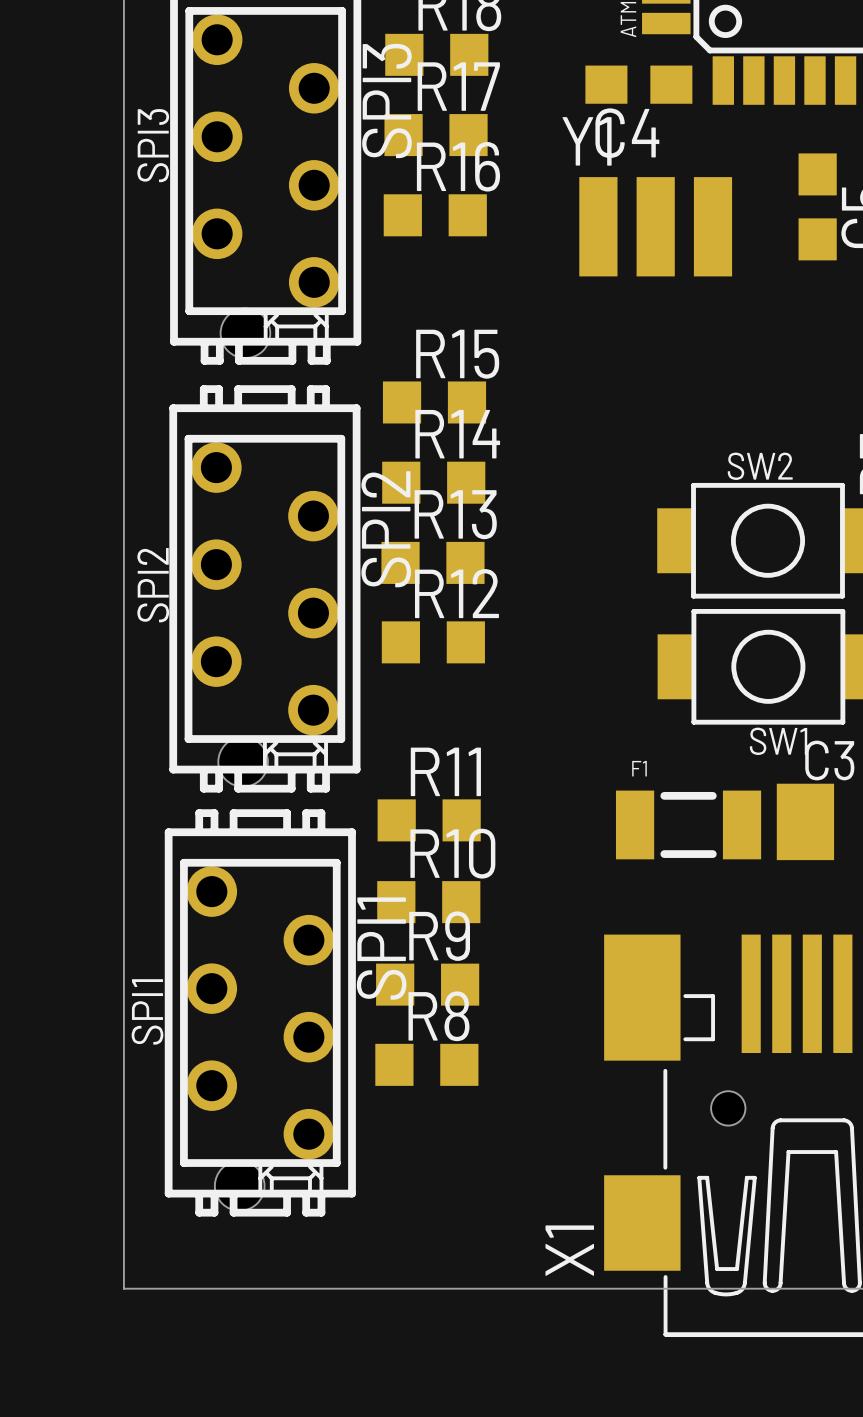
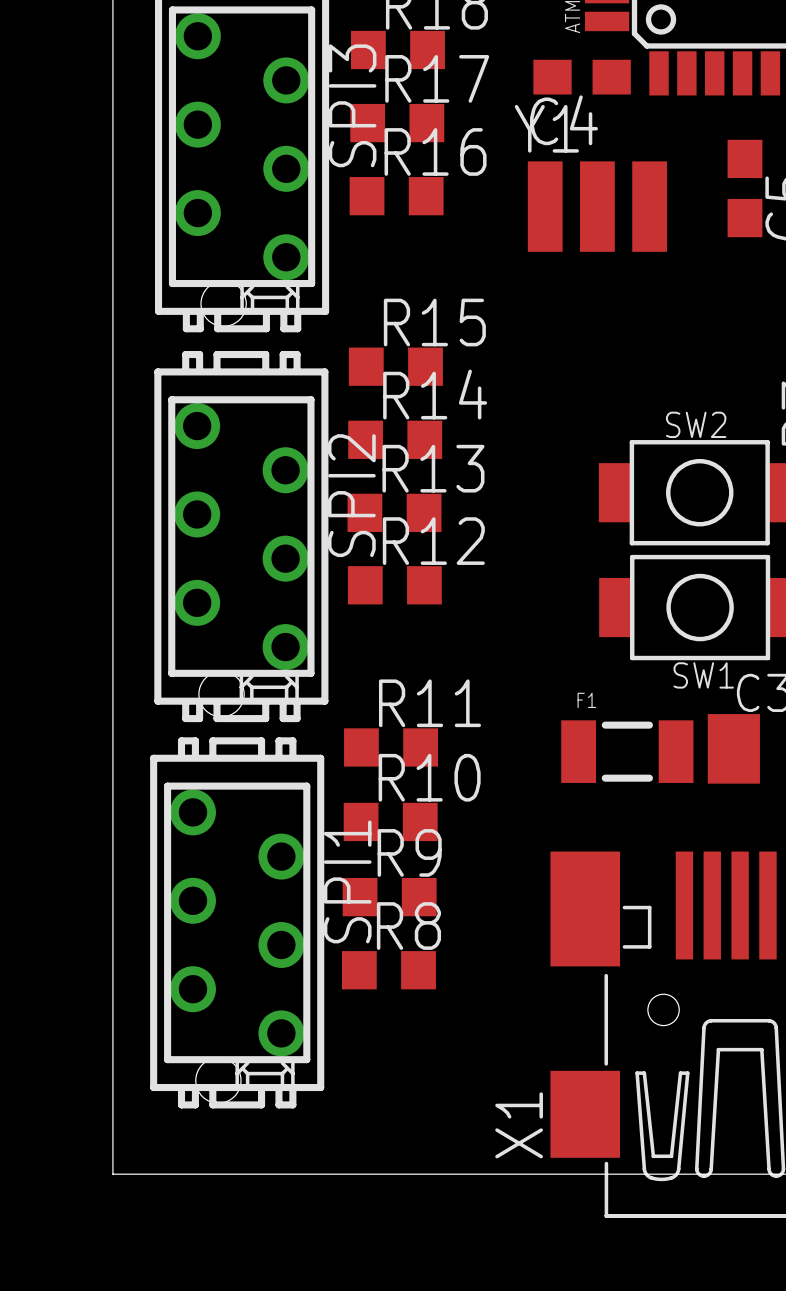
text: SPI3 (153, 145) -> none
text: SPI2 (153, 585) -> none
text: SPI1 (147, 1011) -> none

